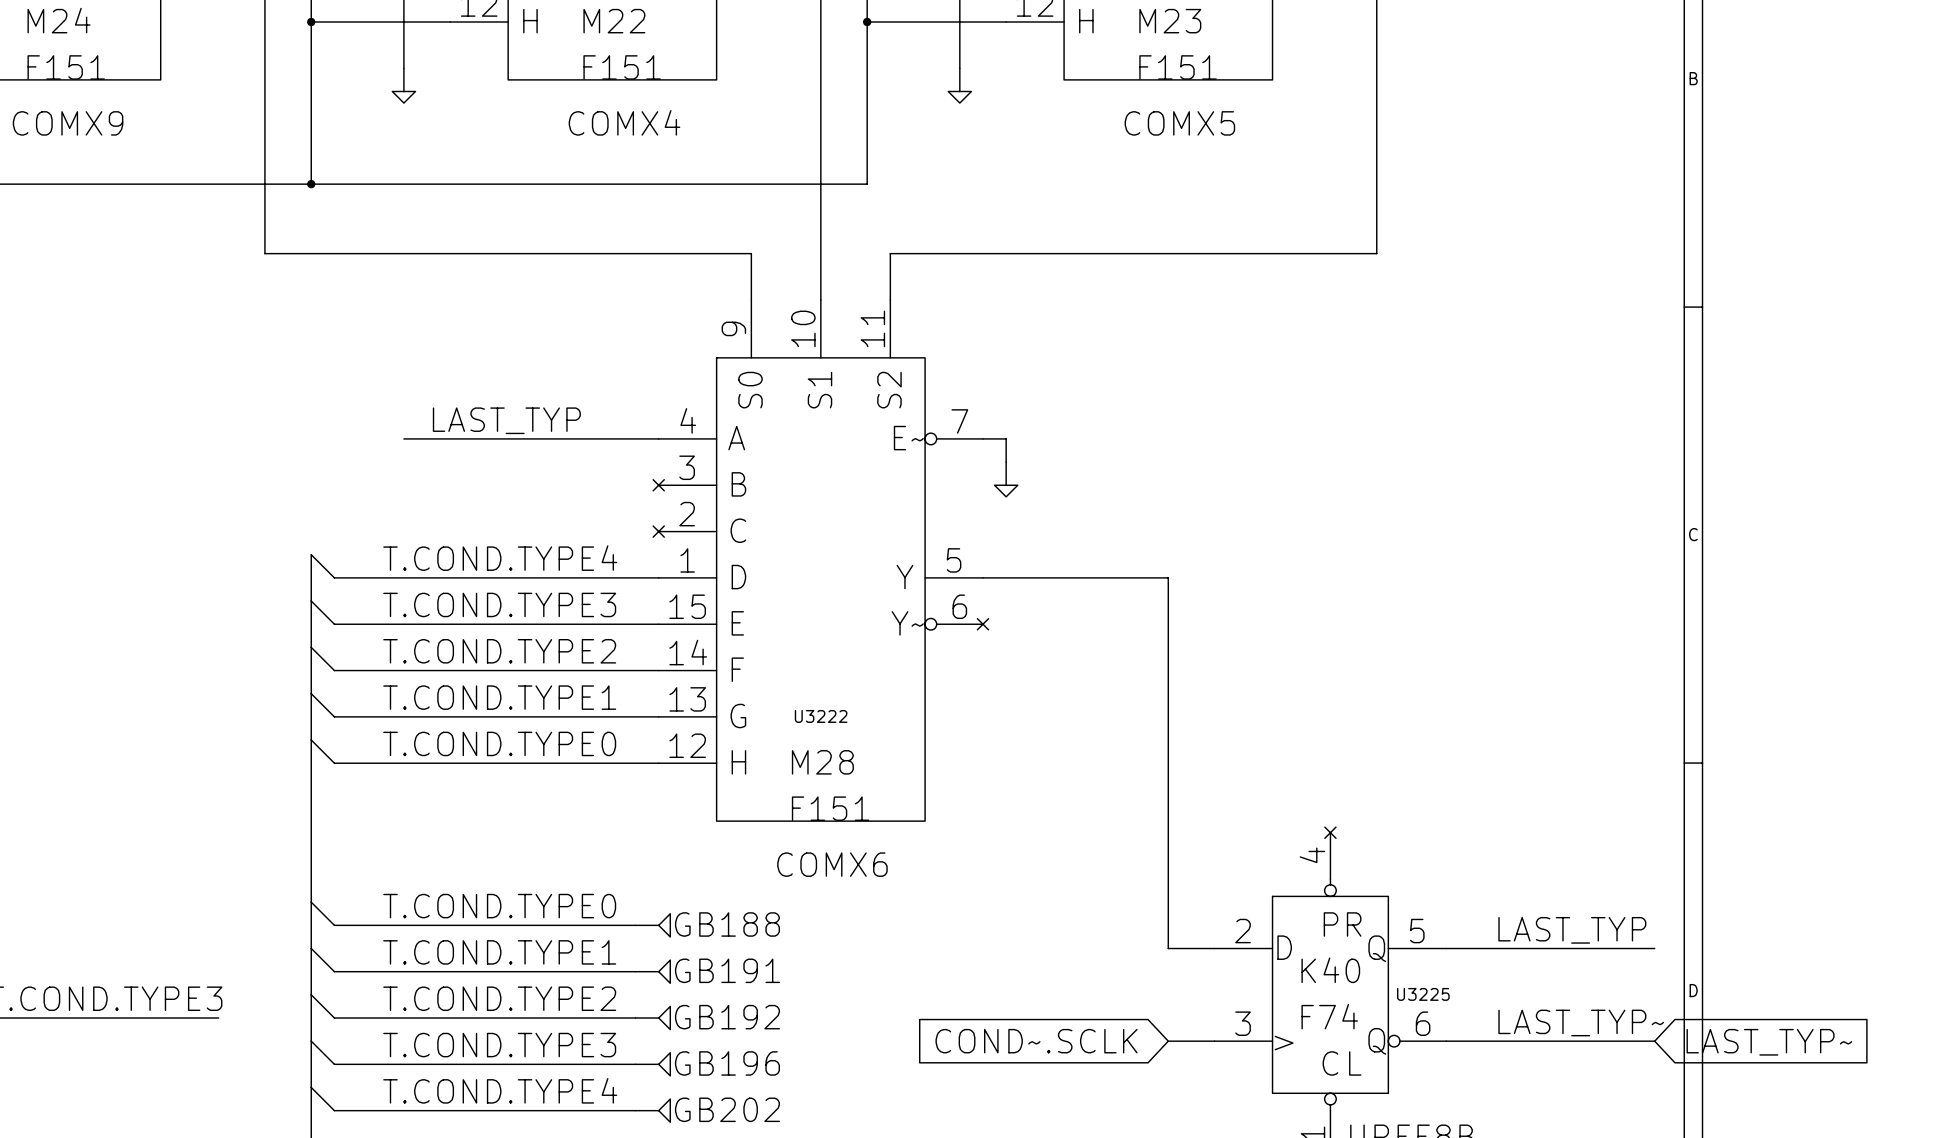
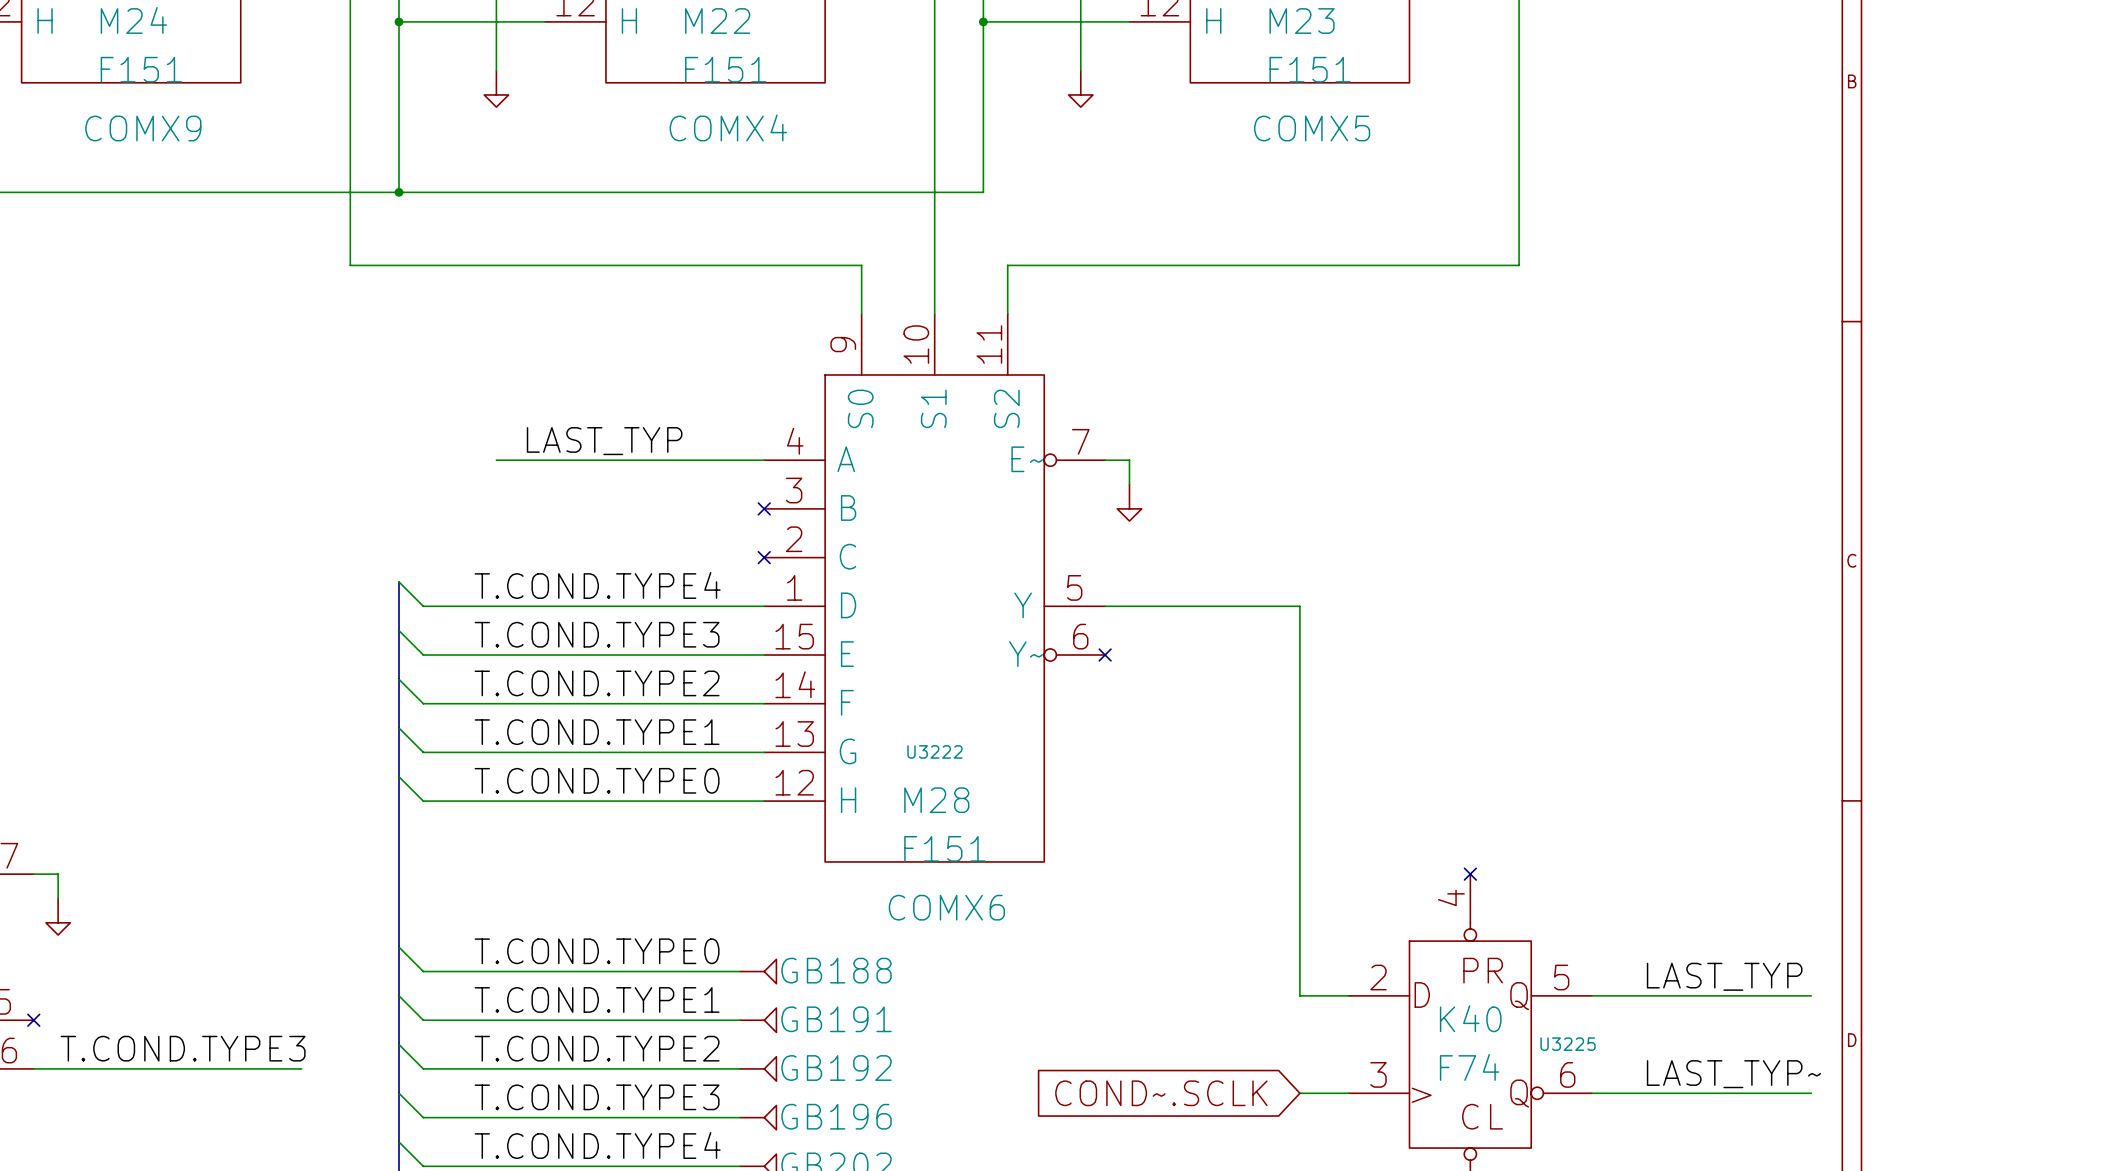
global label: LAST_TYP~ (1769, 1042) -> none

